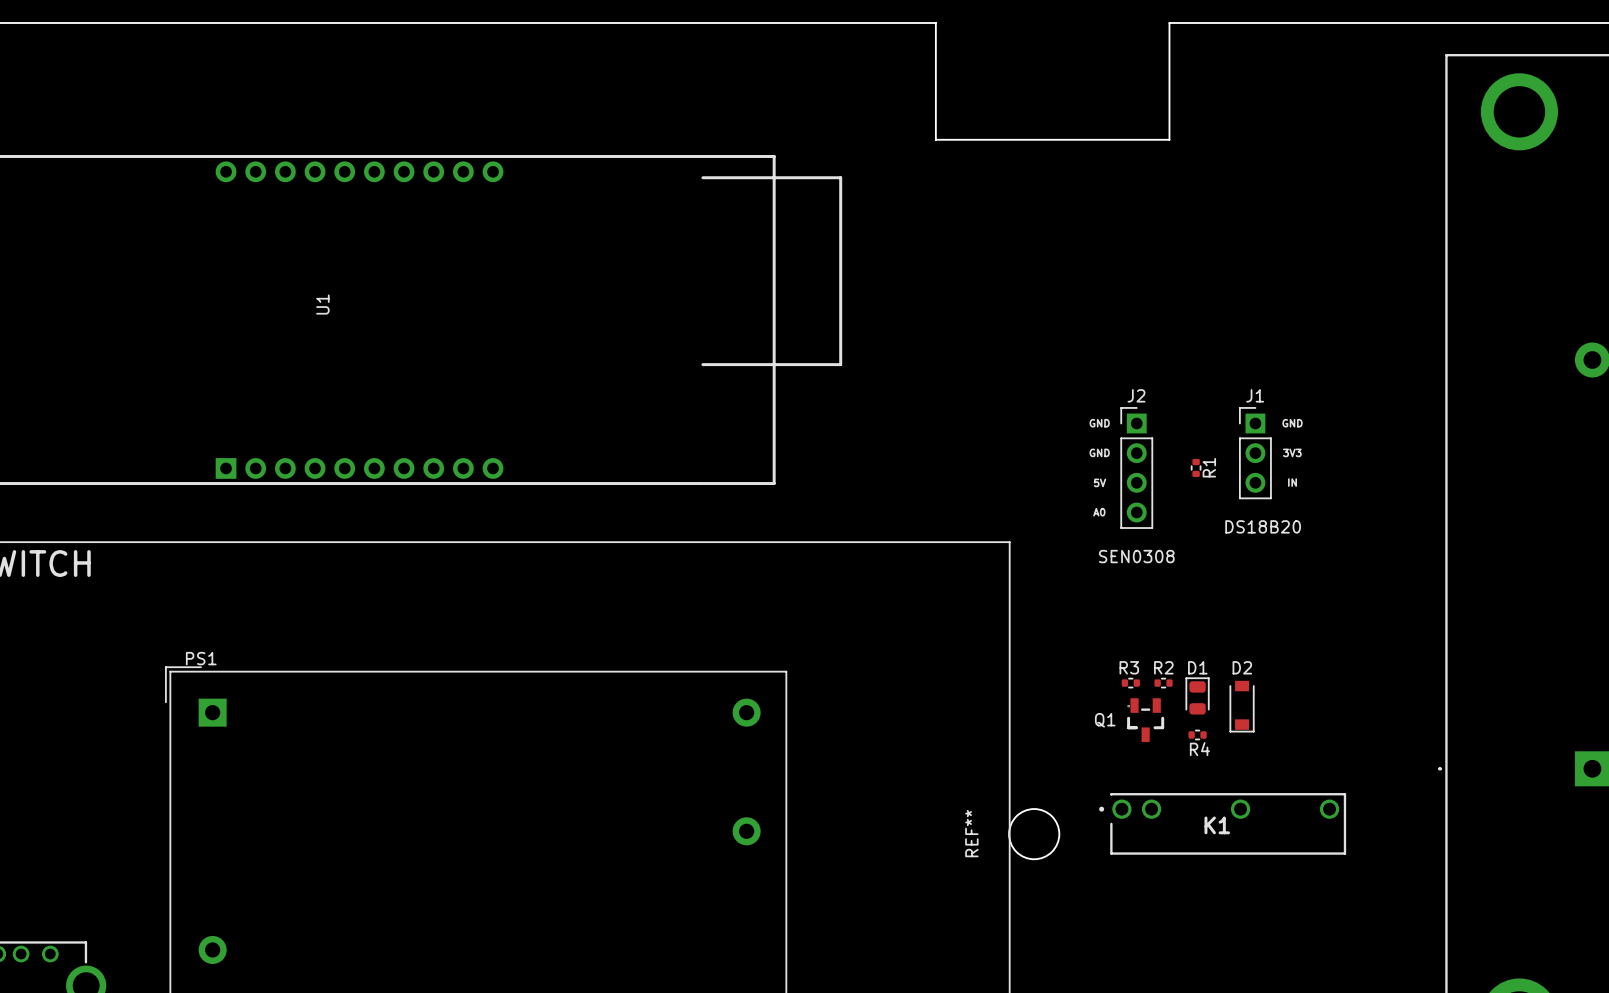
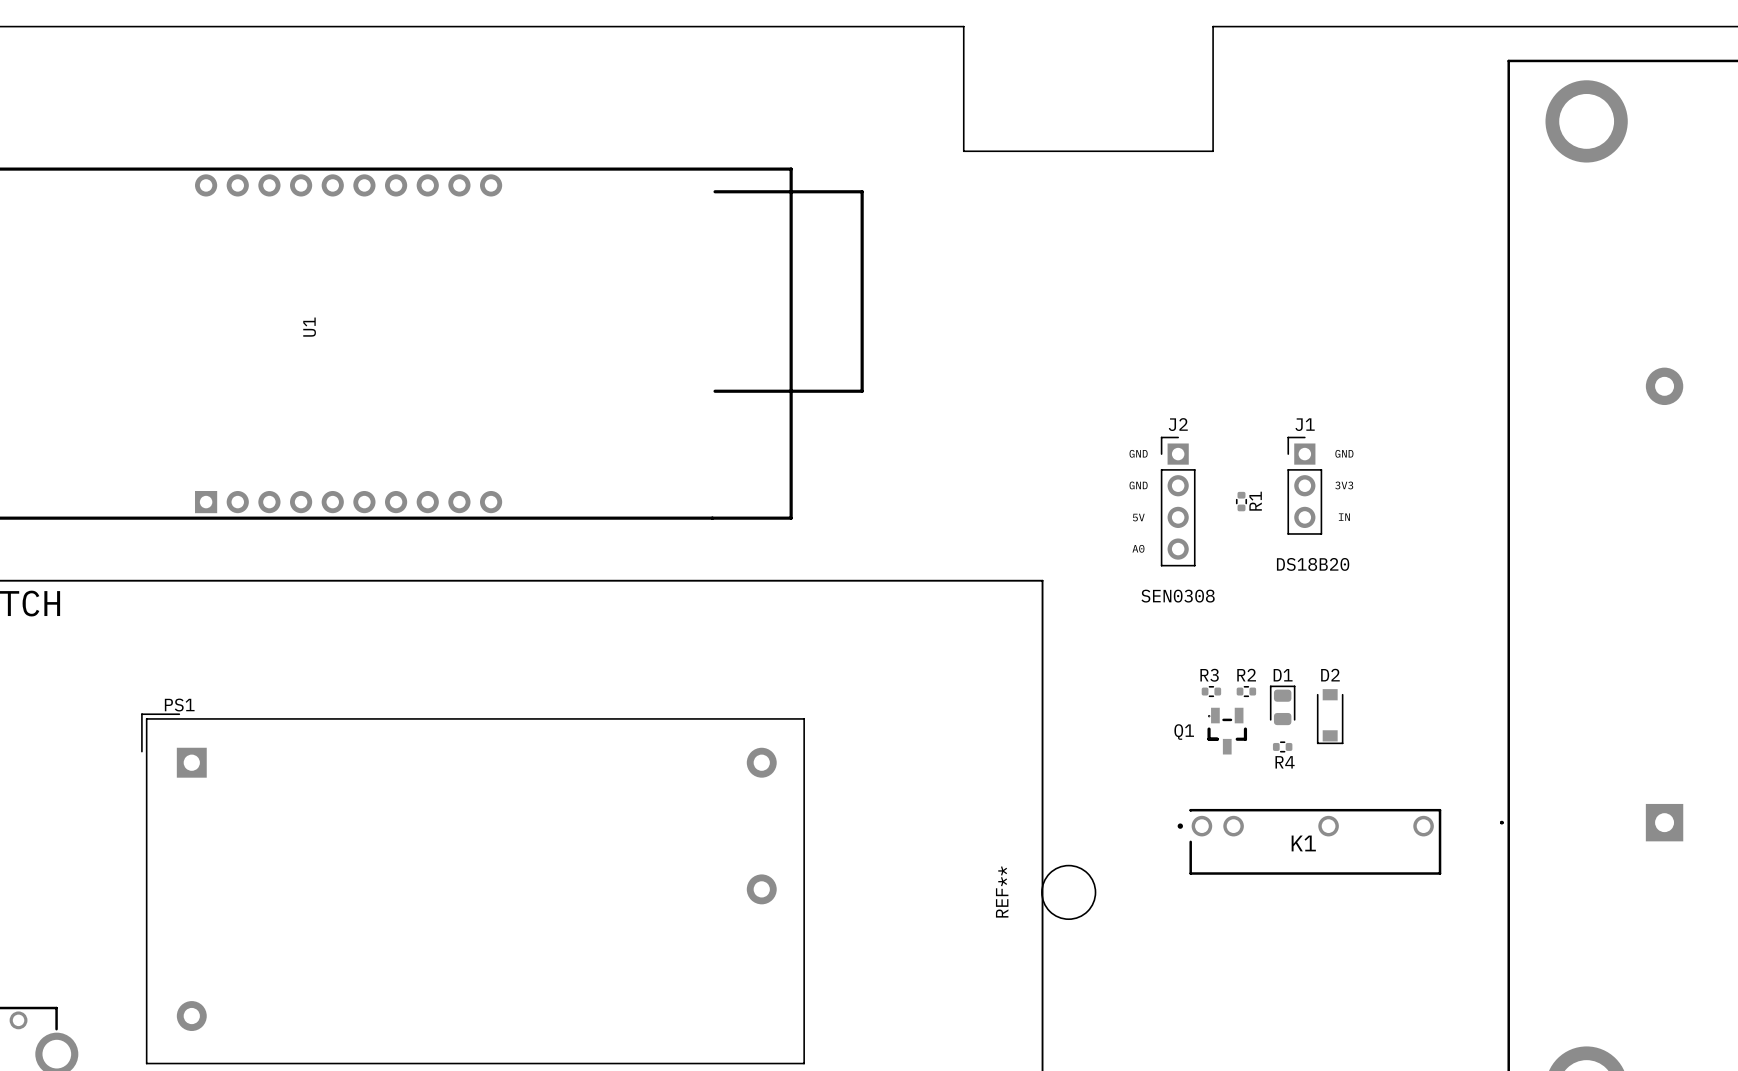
R3 position: (1130, 683) -> (1211, 691)
R2 position: (1163, 683) -> (1246, 691)
D1 position: (1197, 696) -> (1282, 705)
D2 position: (1242, 706) -> (1330, 716)
Q1 position: (1145, 720) -> (1227, 731)
R4 position: (1197, 734) -> (1282, 746)
K1 position: (1222, 823) -> (1309, 841)

